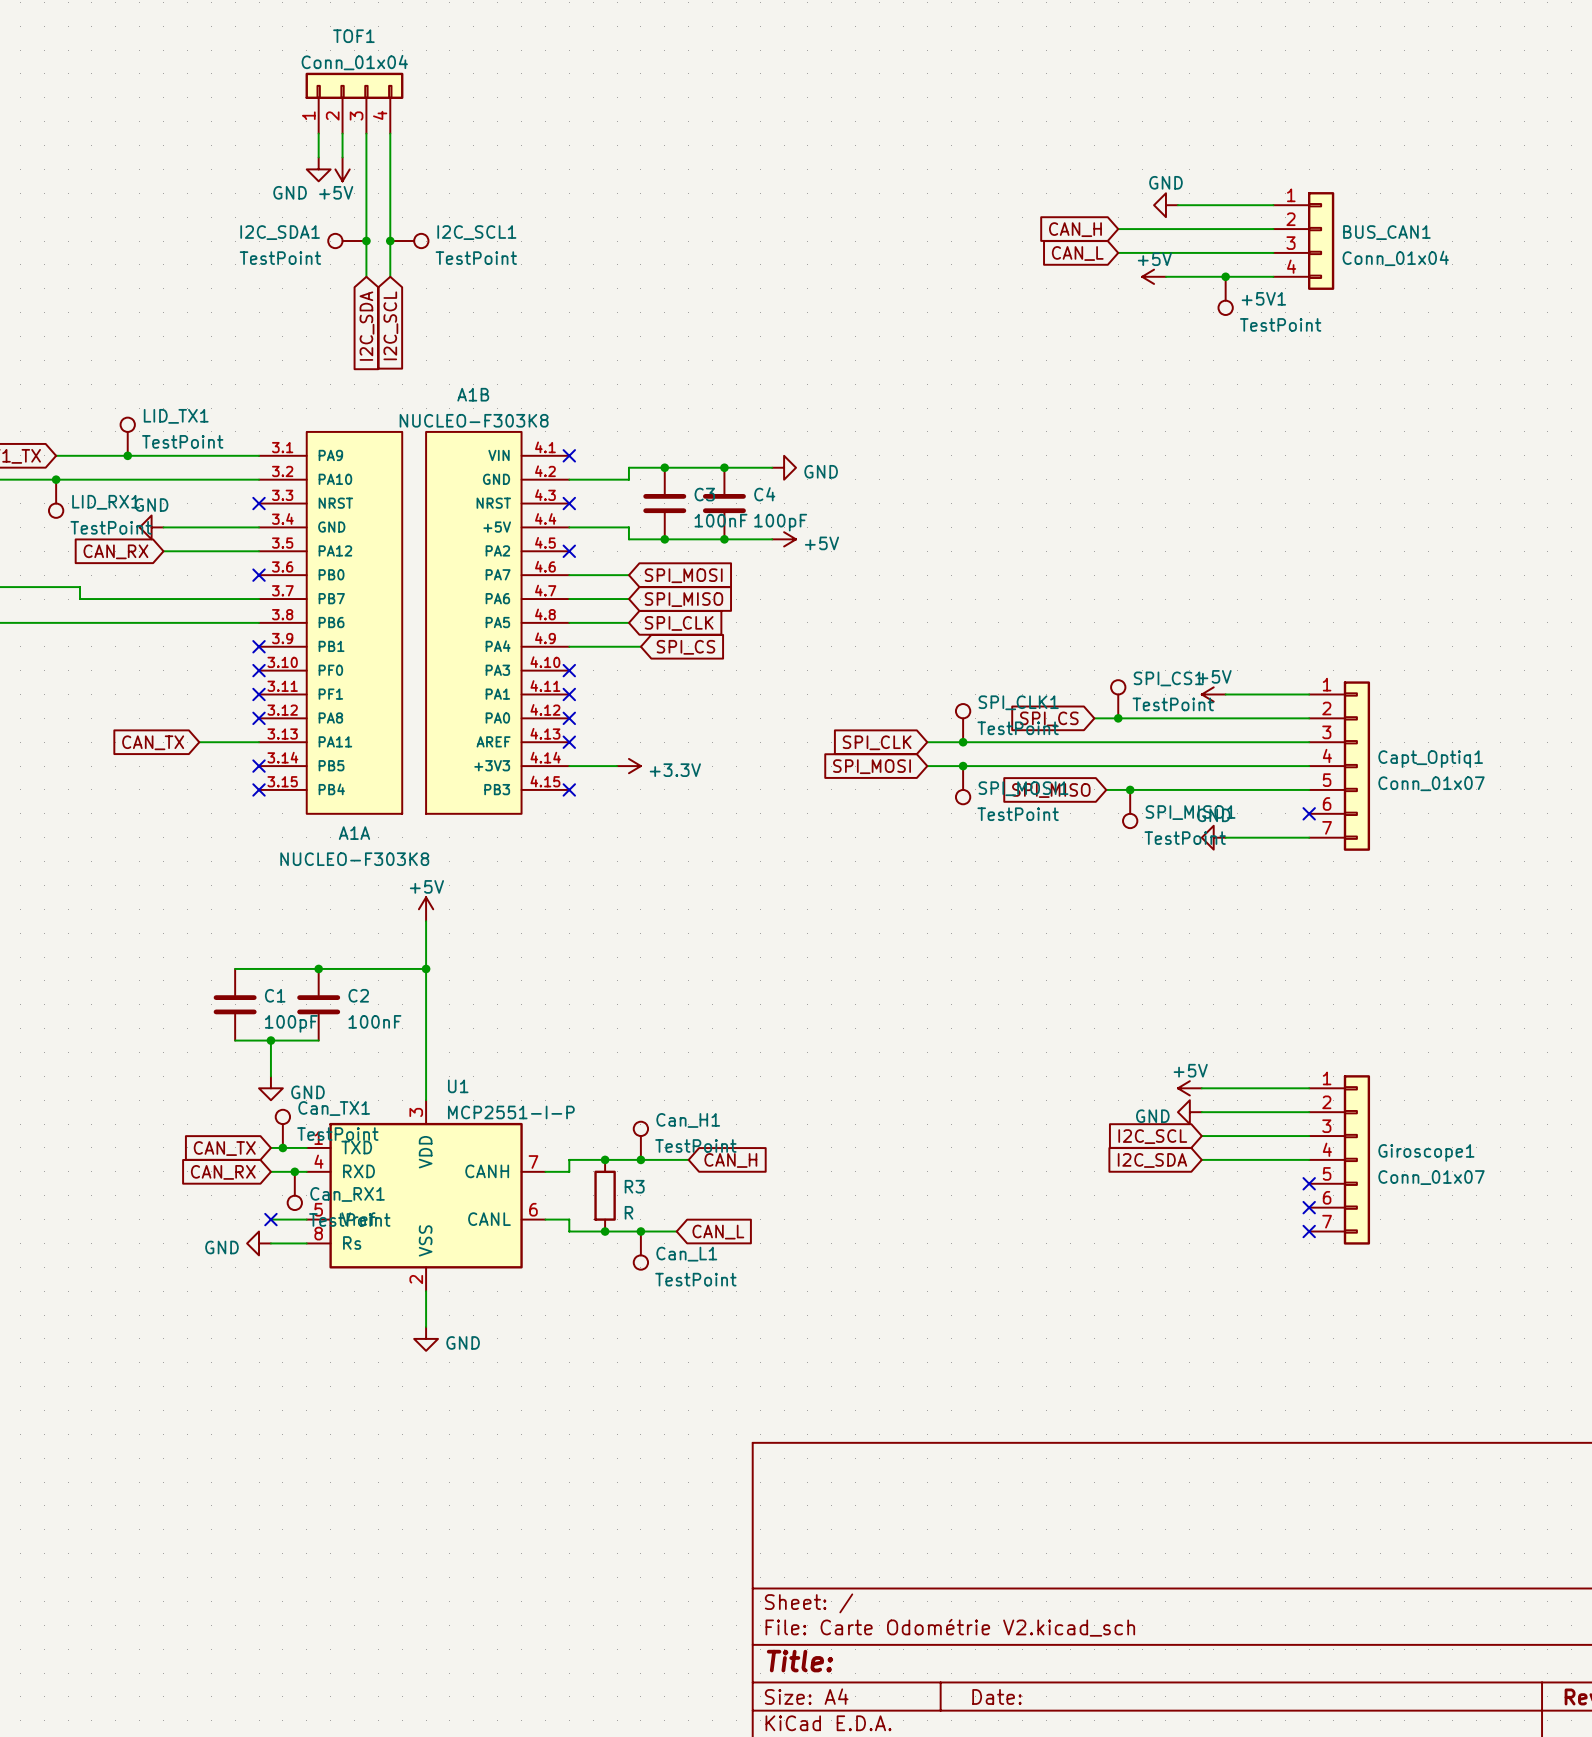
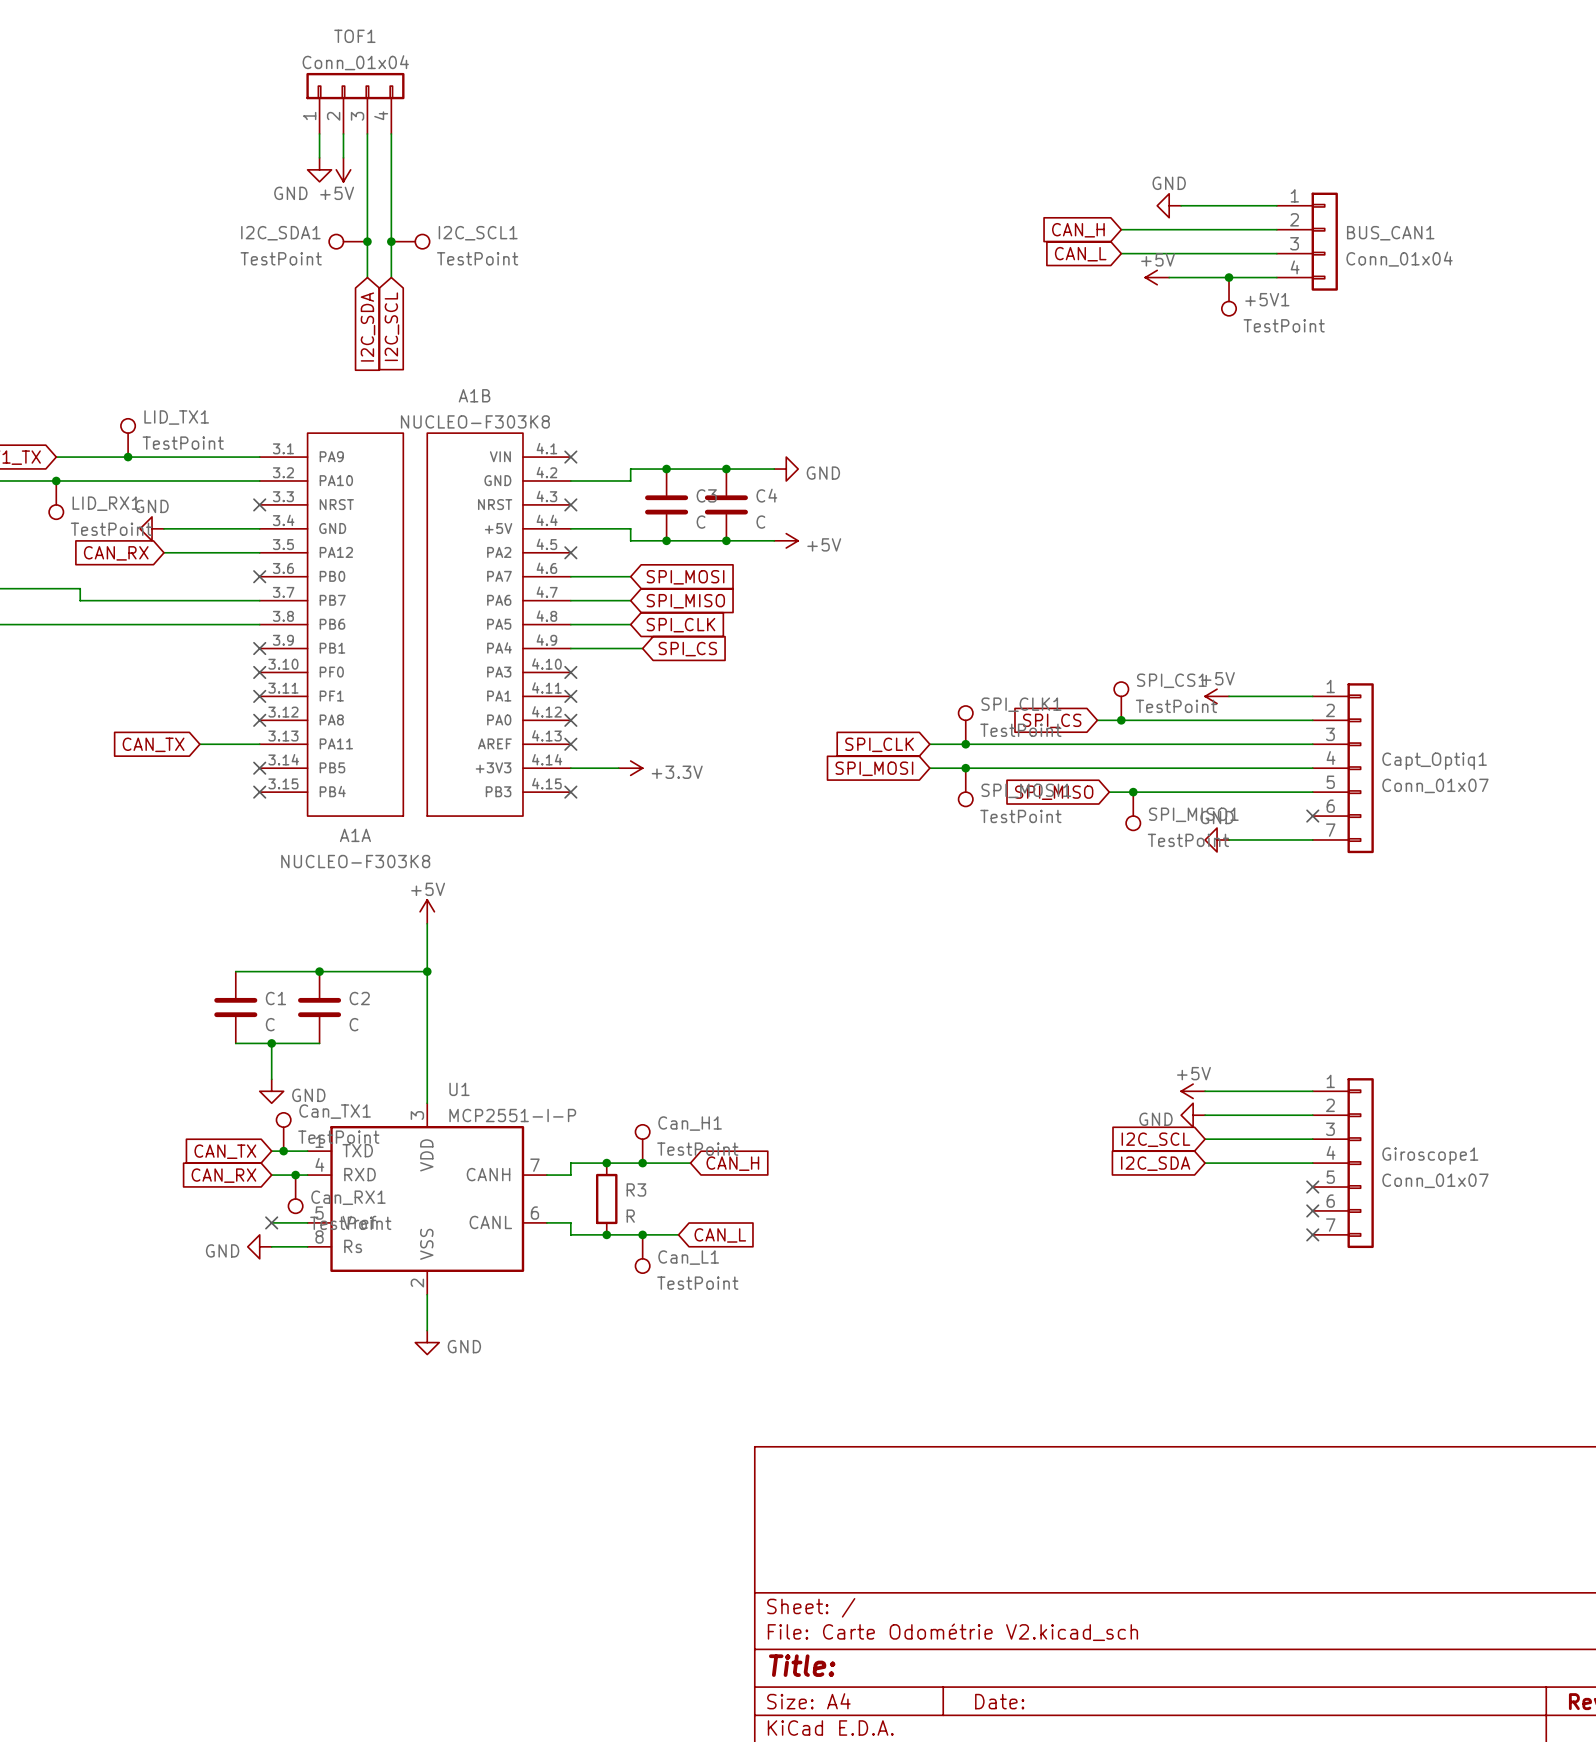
C3 value: 100nF (721, 520) -> C (701, 522)
C4 value: 100pF (780, 522) -> C (760, 522)
C2 value: 100nF (374, 1021) -> C (354, 1024)
C1 value: 100pF (291, 1023) -> C (270, 1024)

